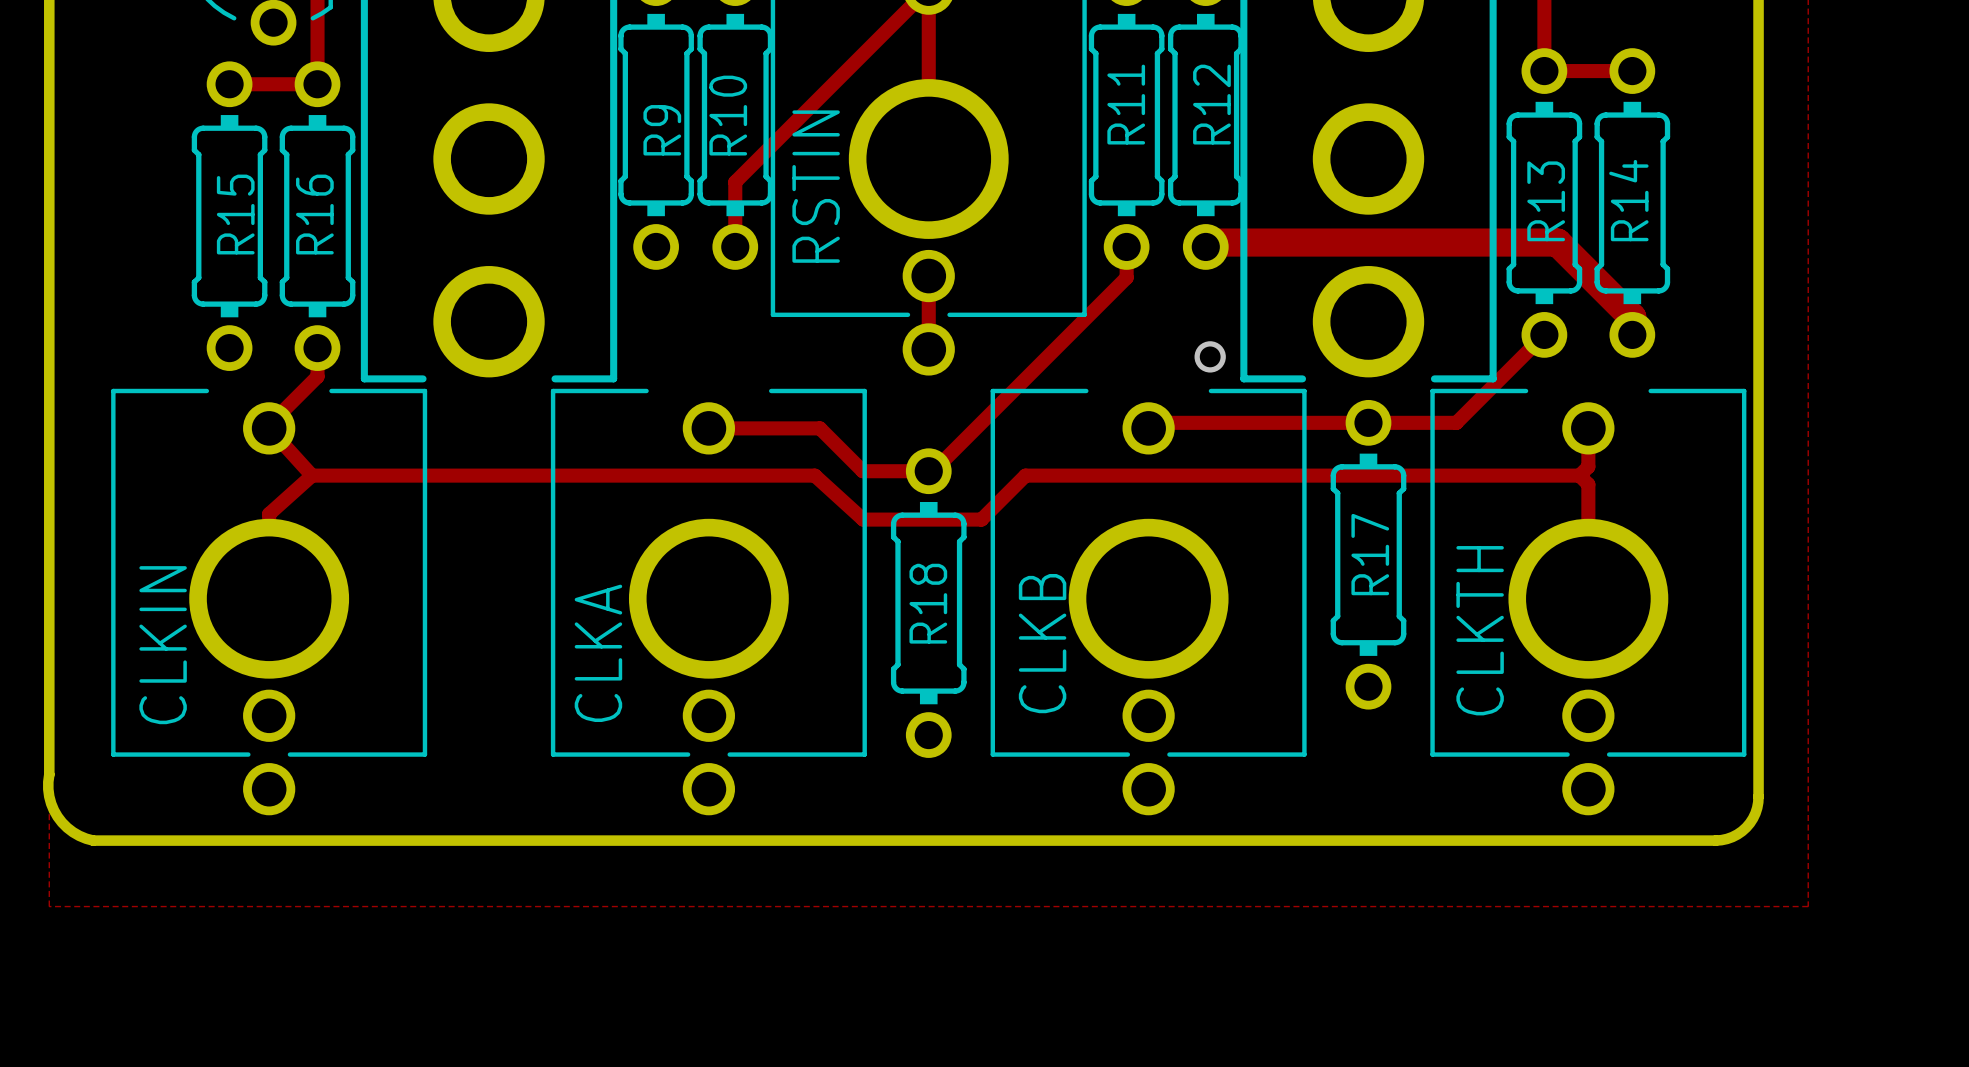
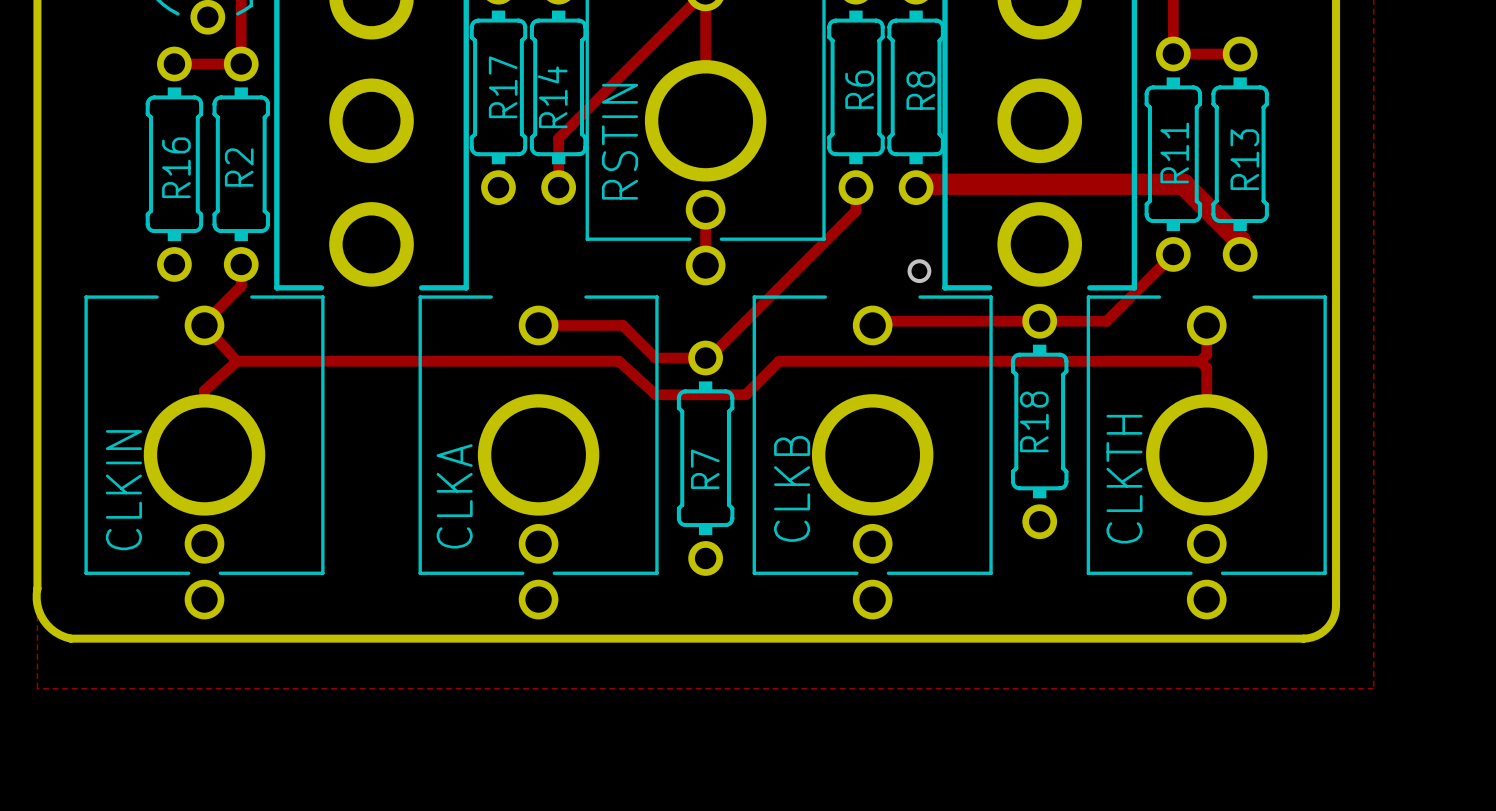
R11 name: R11 (1126, 104) -> R6 (859, 89)
R12 name: R12 (1211, 104) -> R8 (920, 90)
R10 name: R10 (728, 115) -> R14 (552, 97)
R9 name: R9 (662, 130) -> R17 (503, 87)
R14 name: R14 (1628, 200) -> R13 (1244, 159)
R13 name: R13 (1546, 201) -> R11 (1174, 152)
R15 name: R15 (235, 214) -> R16 (176, 167)
R16 name: R16 (314, 214) -> R2 (239, 167)
R17 name: R17 (1370, 554) -> R18 (1034, 421)
R18 name: R18 (928, 603) -> R7 (705, 469)

